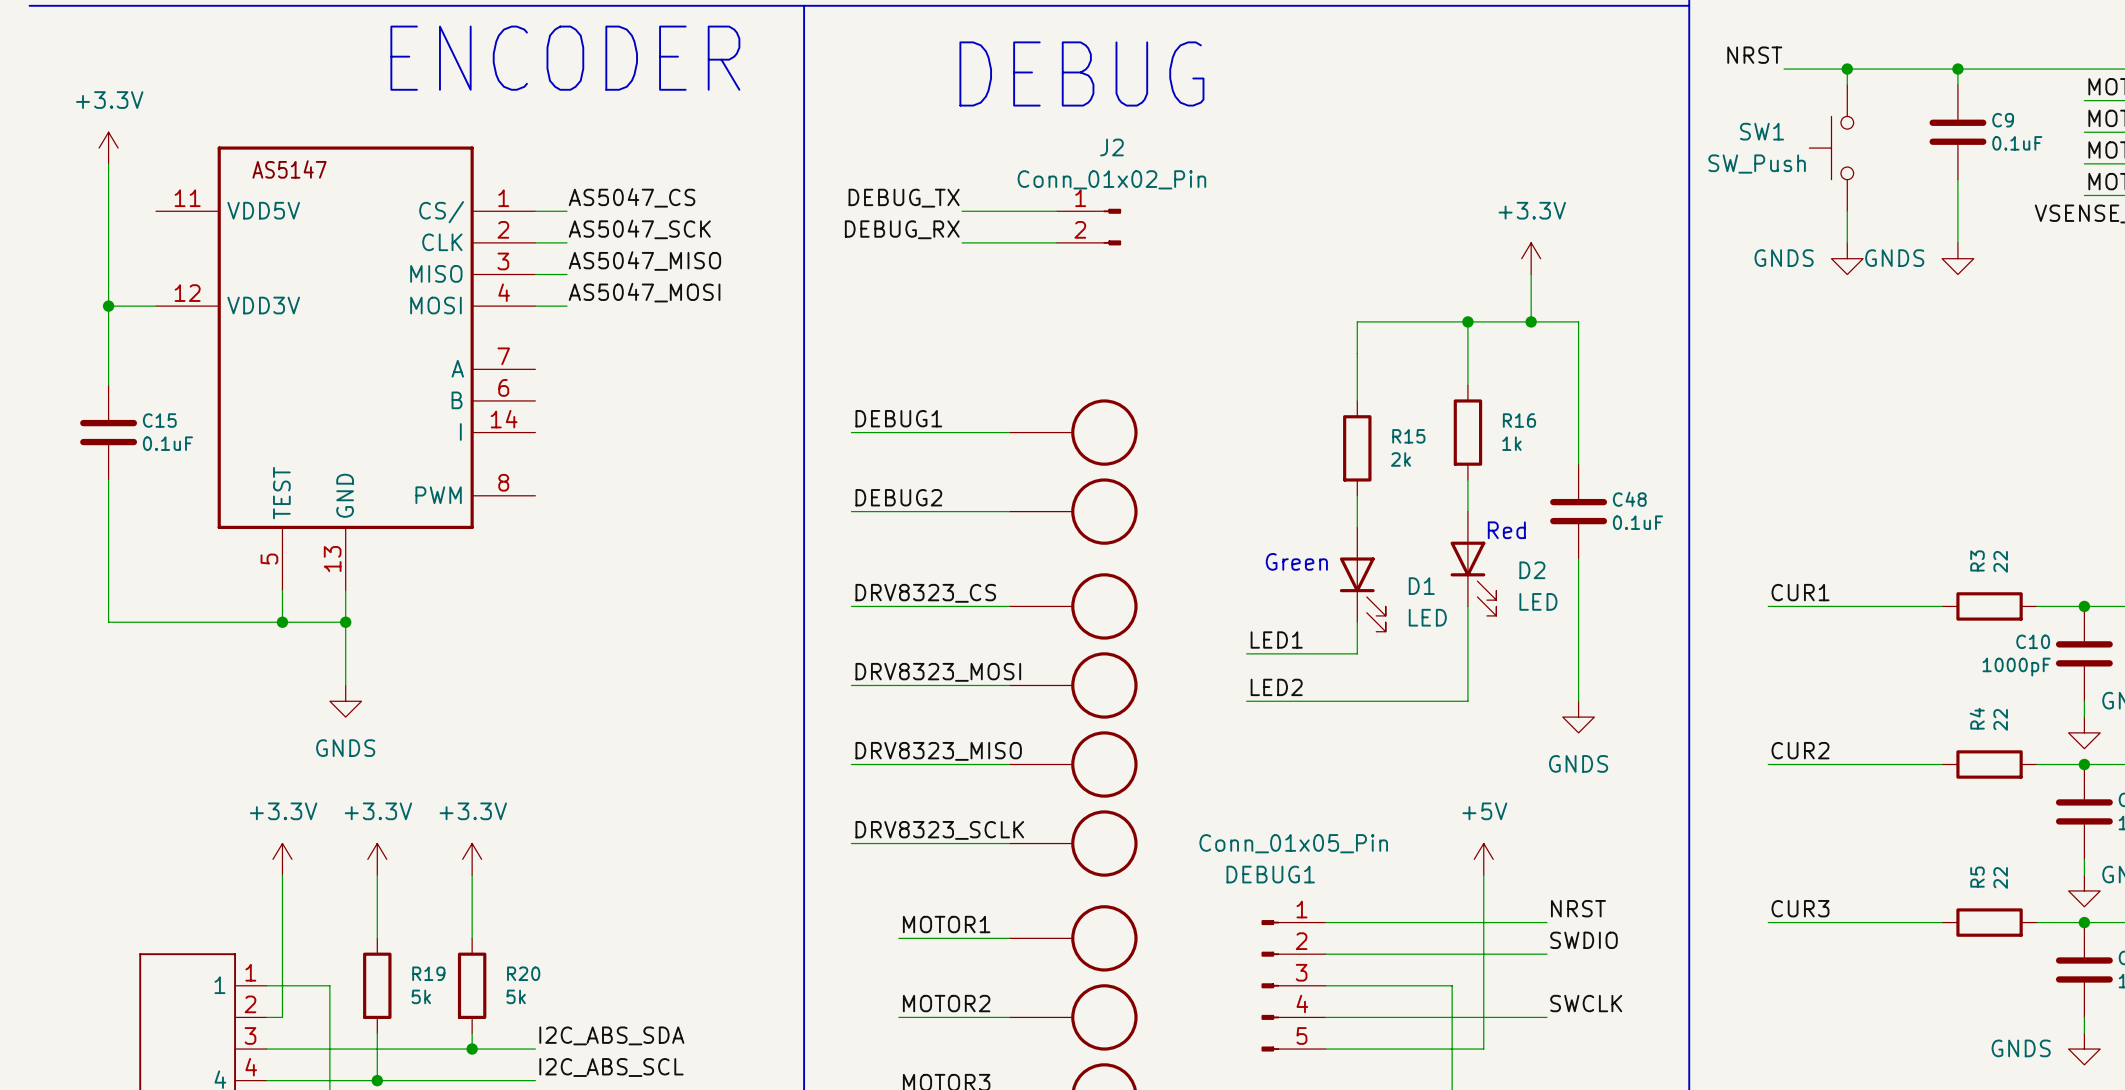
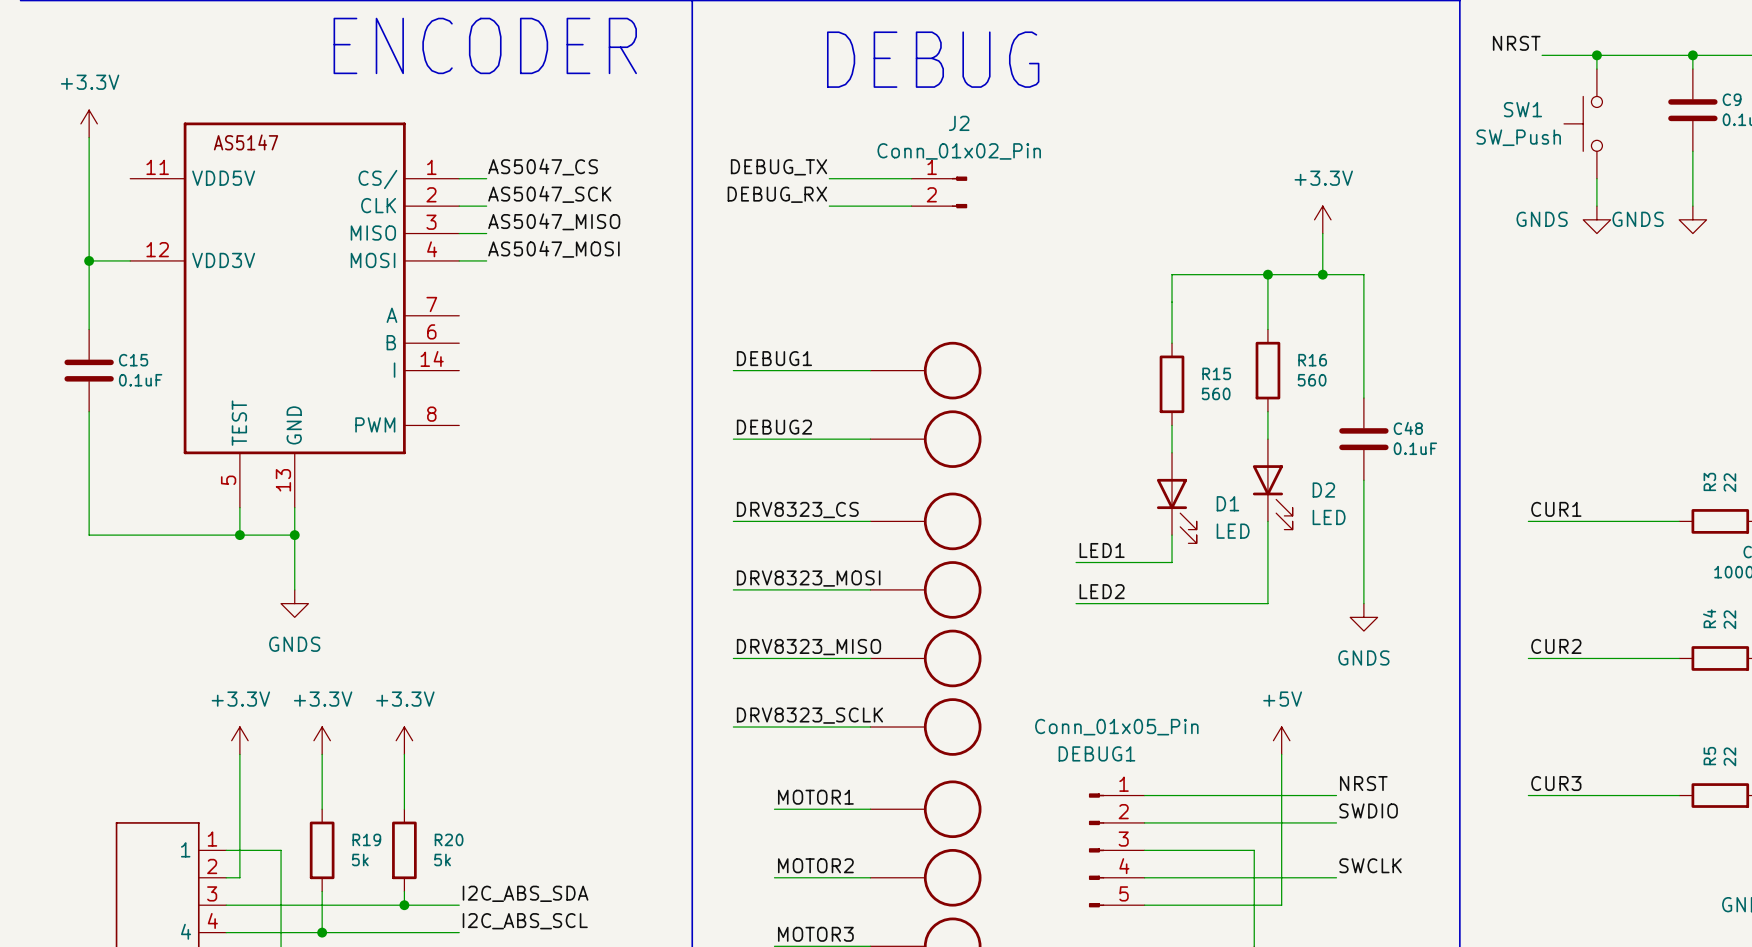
R16 value: 1k (1511, 443) -> 560 (1312, 380)
R15 value: 2k (1401, 459) -> 560 (1216, 393)
text: Red (1506, 530) -> none
text: Green (1296, 561) -> none

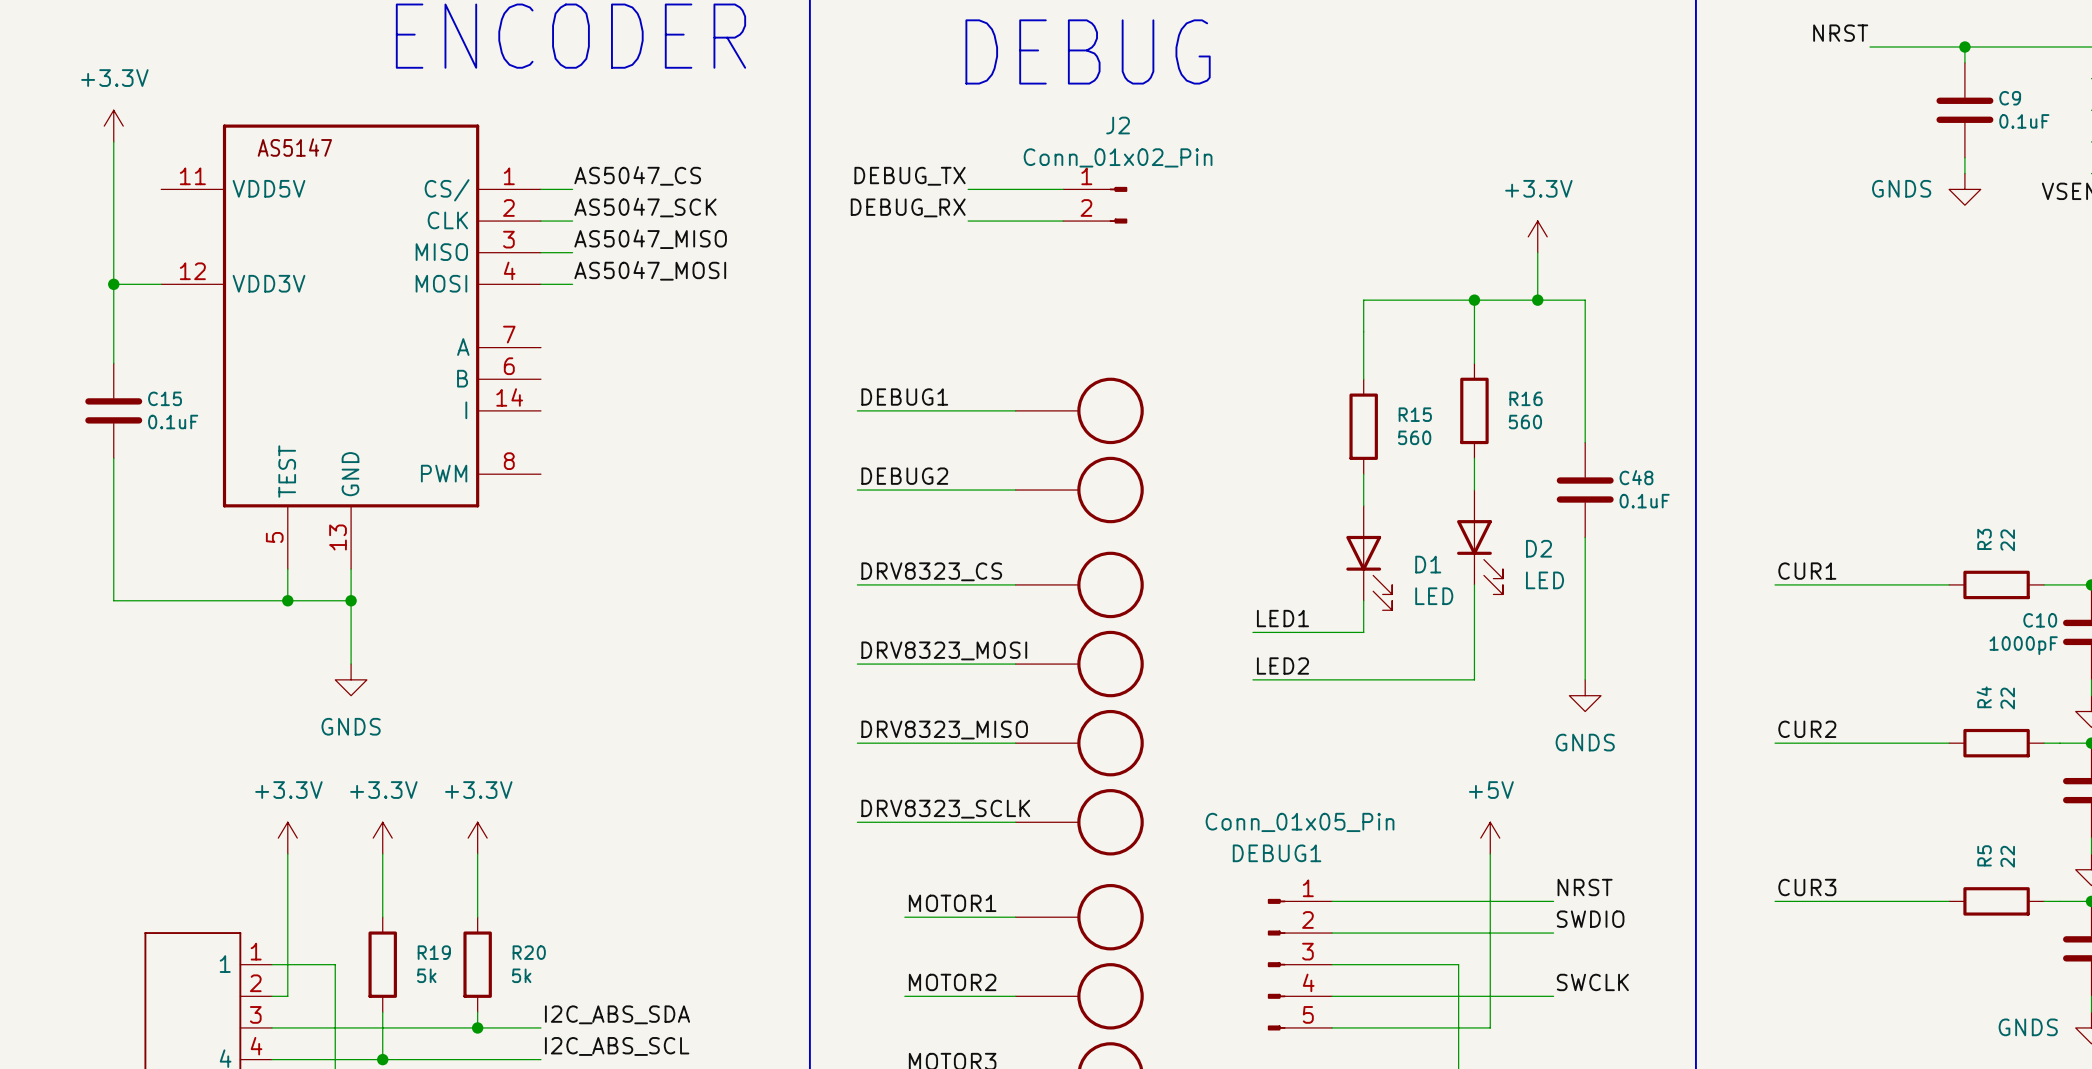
label position: NRST (1516, 43) -> NRST (1840, 33)
wire: (1542, 55) (1610, 55) -> none
wire: (1596, 55) (1596, 69) -> none
junction: (1596, 55) -> none
SW1: SW_Push (1583, 123) -> none
wire: (1692, 165) (1692, 206) -> none
wire: (1596, 178) (1596, 206) -> none
power symbol: GNDS (1596, 219) -> none
power symbol position: GNDS (1692, 219) -> GNDS (1964, 189)

